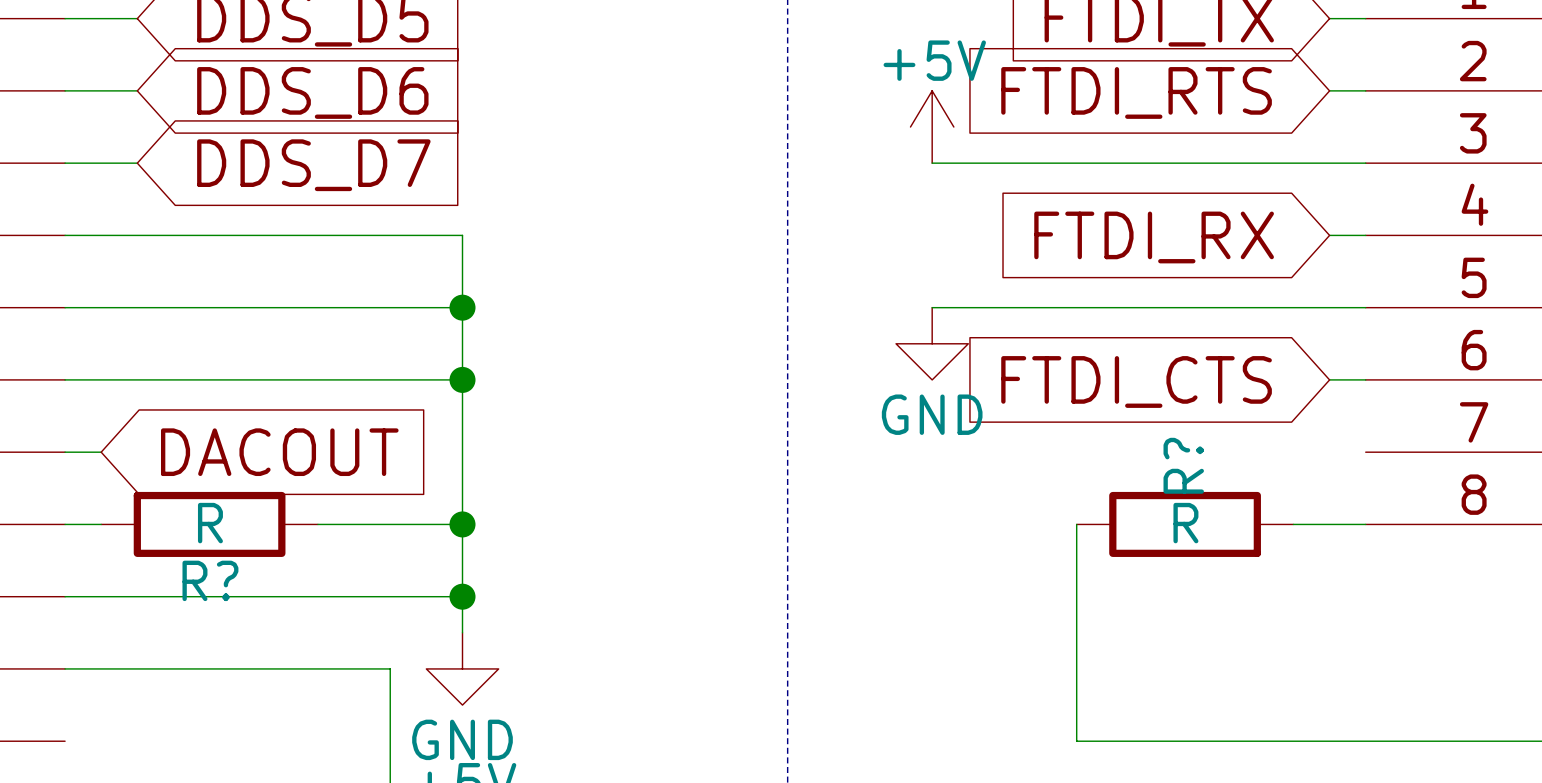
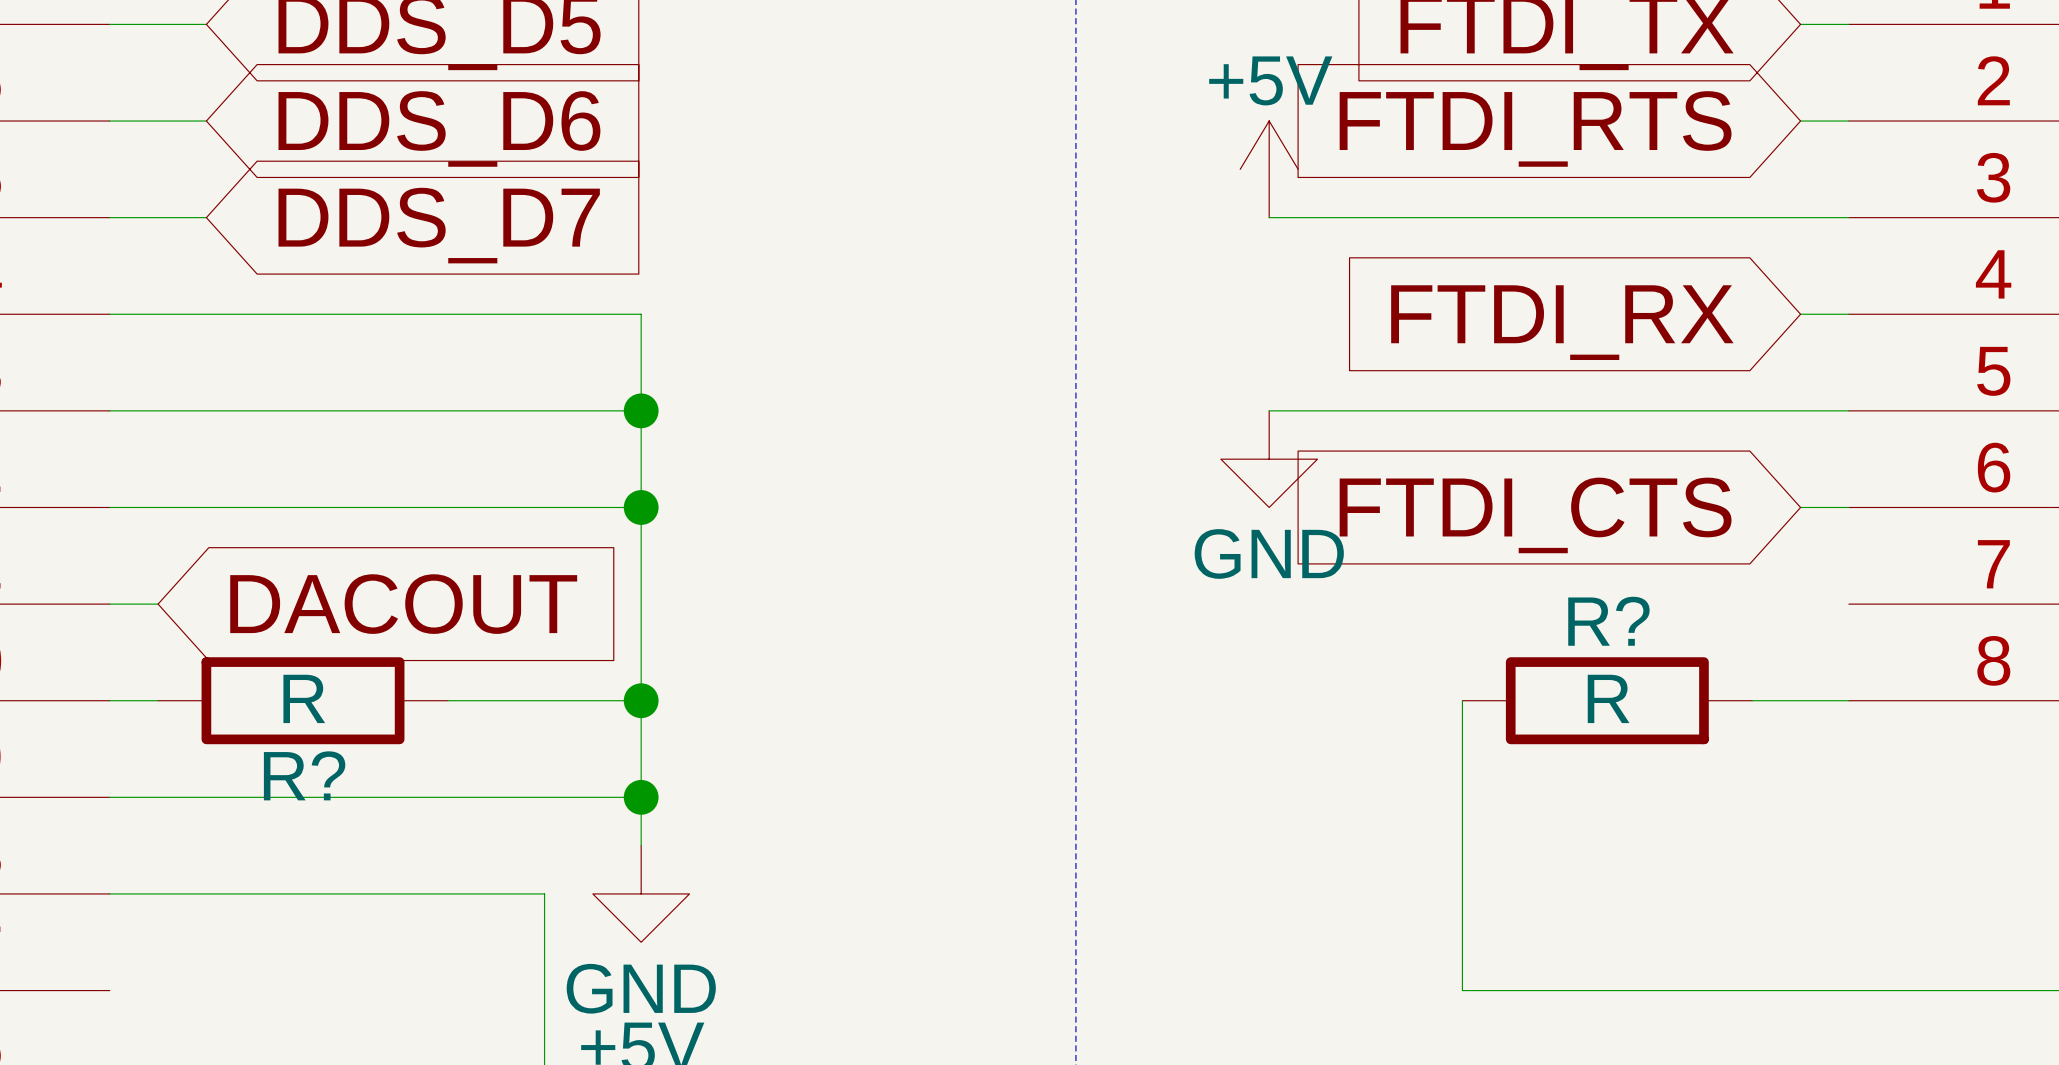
R? name rotation: 0° (1183, 465) -> 90° clockwise (1608, 621)

